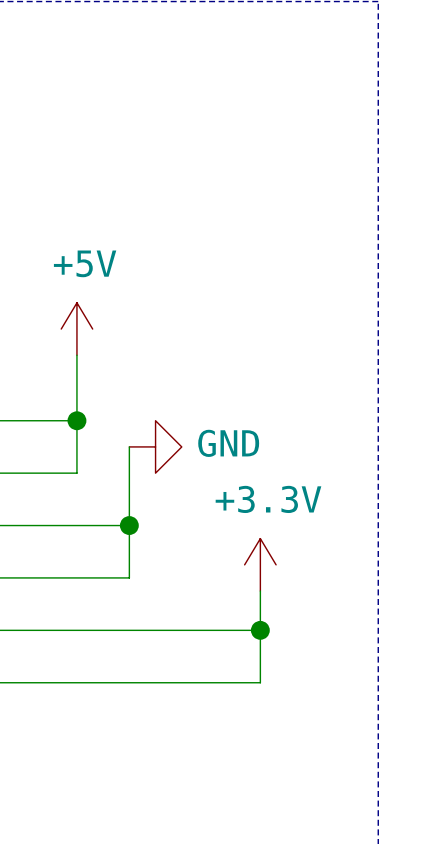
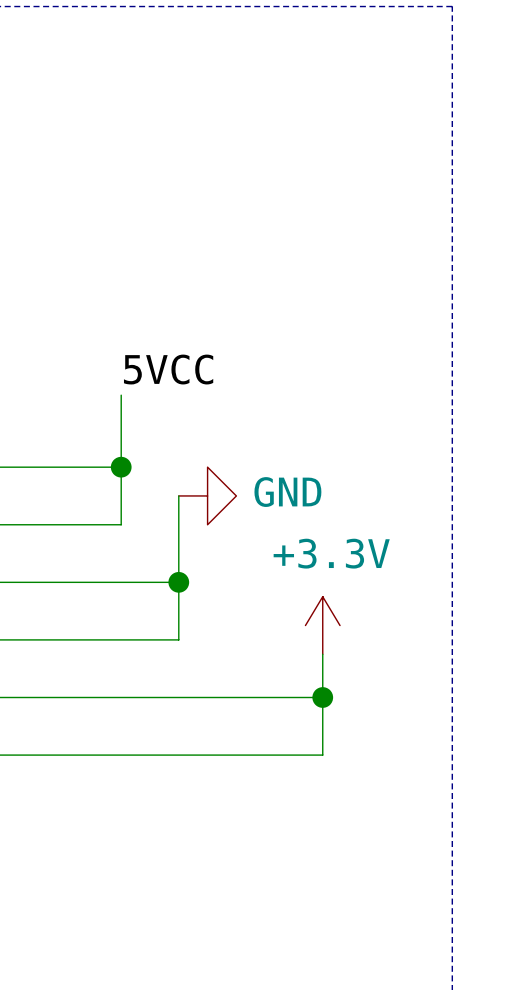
power symbol: +5V (76, 329) -> none
label: none -> 5VCC (168, 369)

